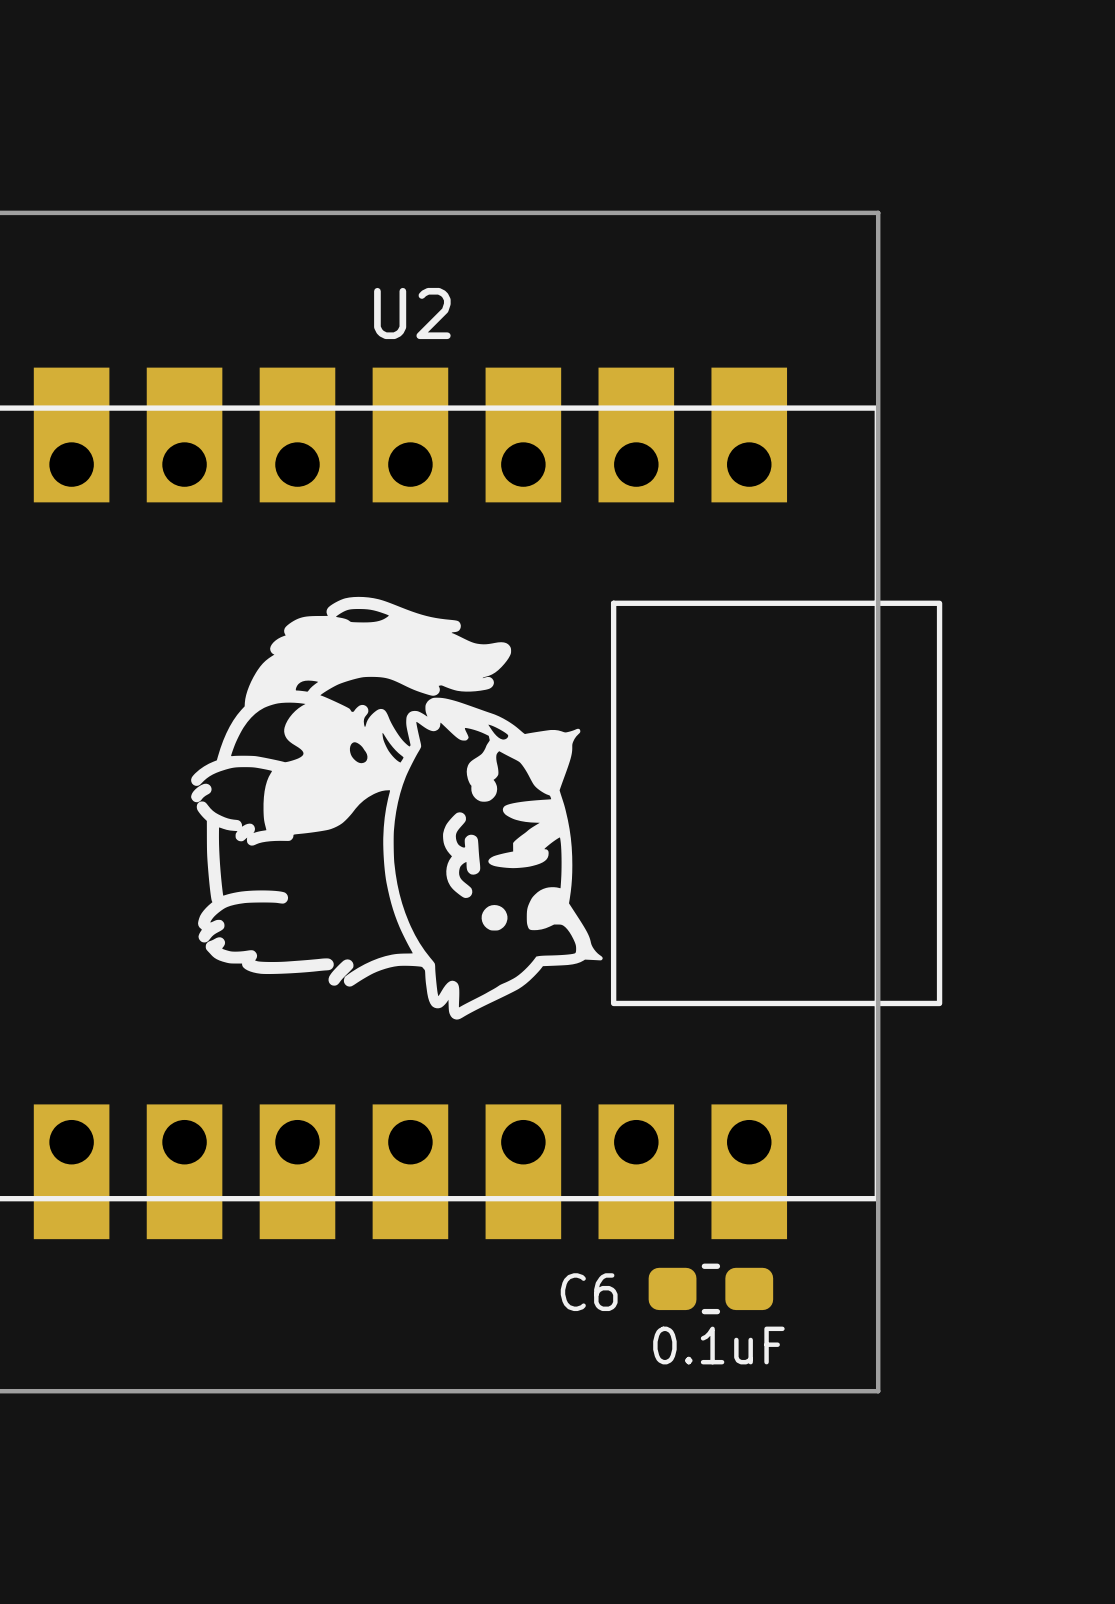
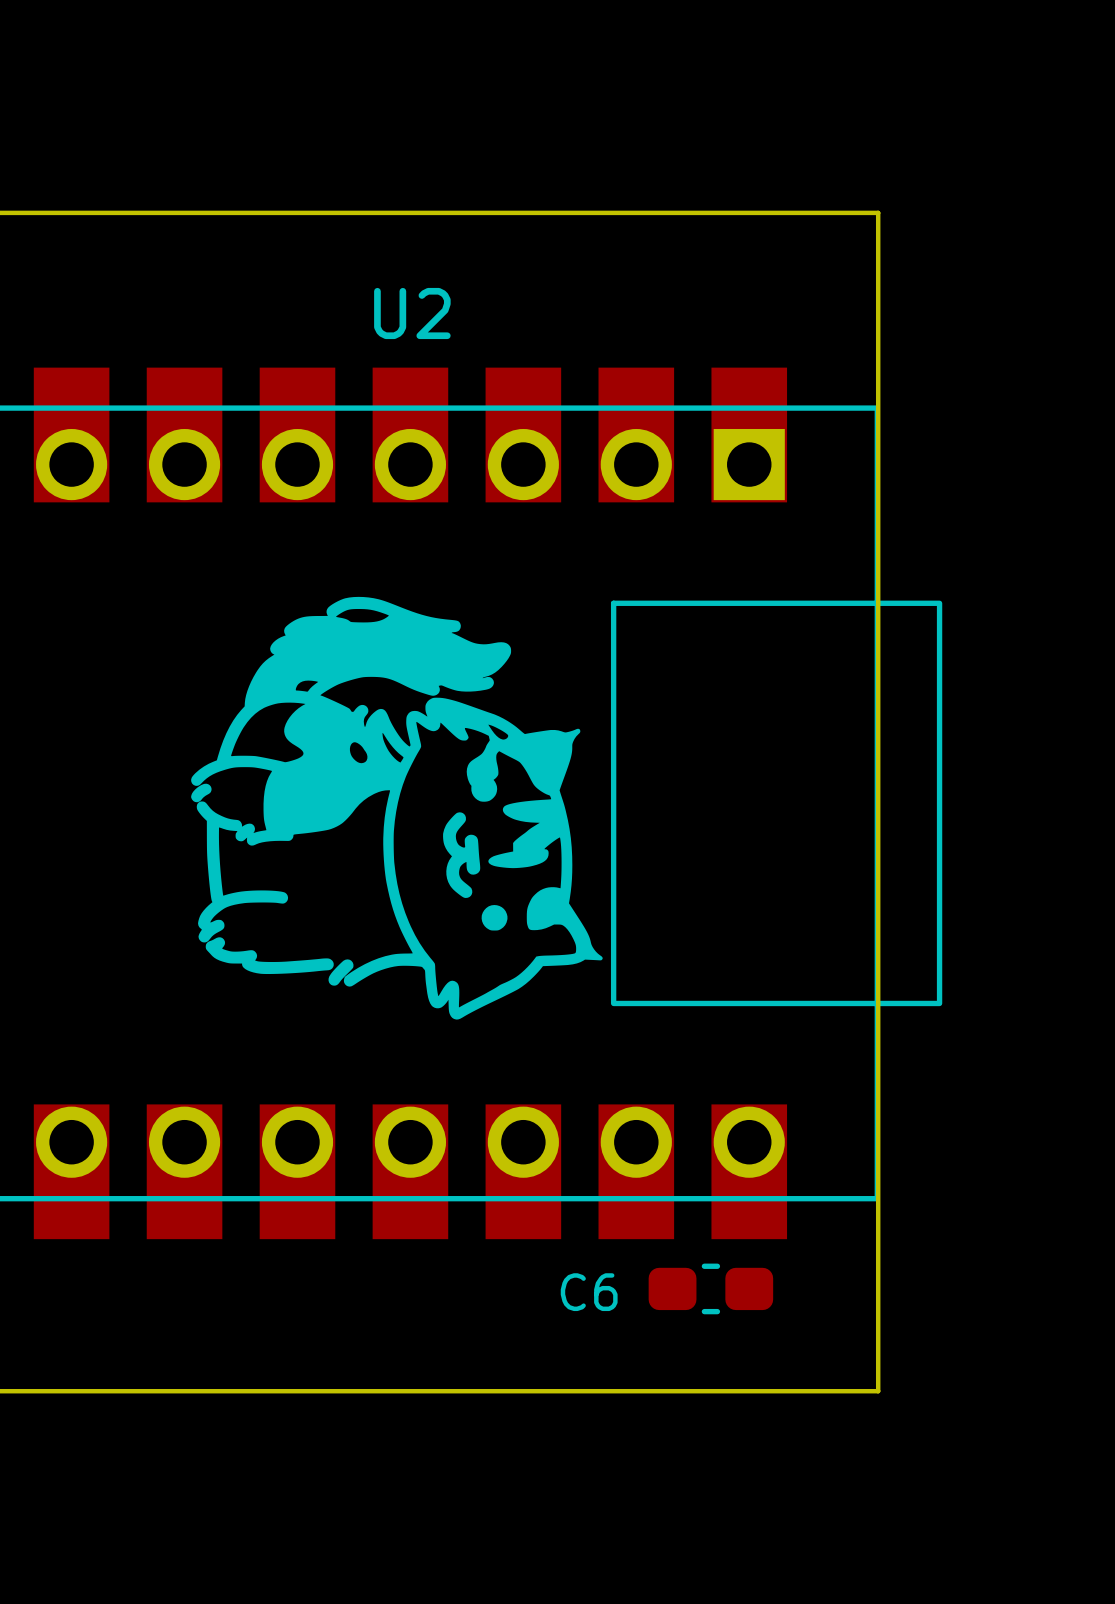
C6 value: 0.1uF (718, 1345) -> none

